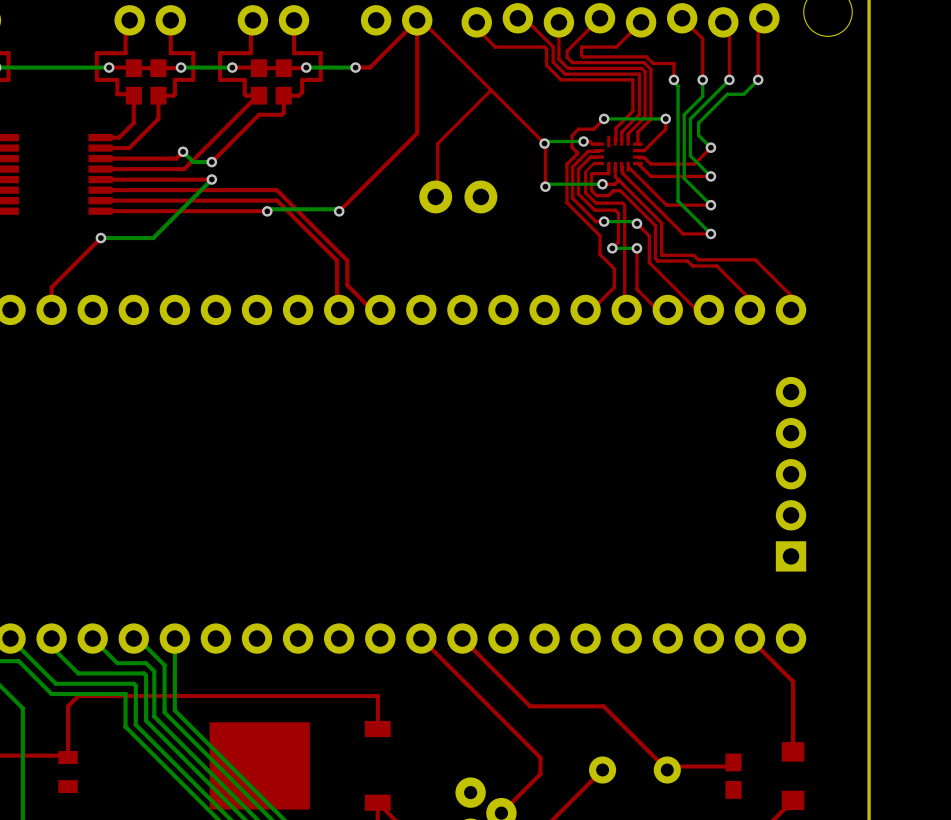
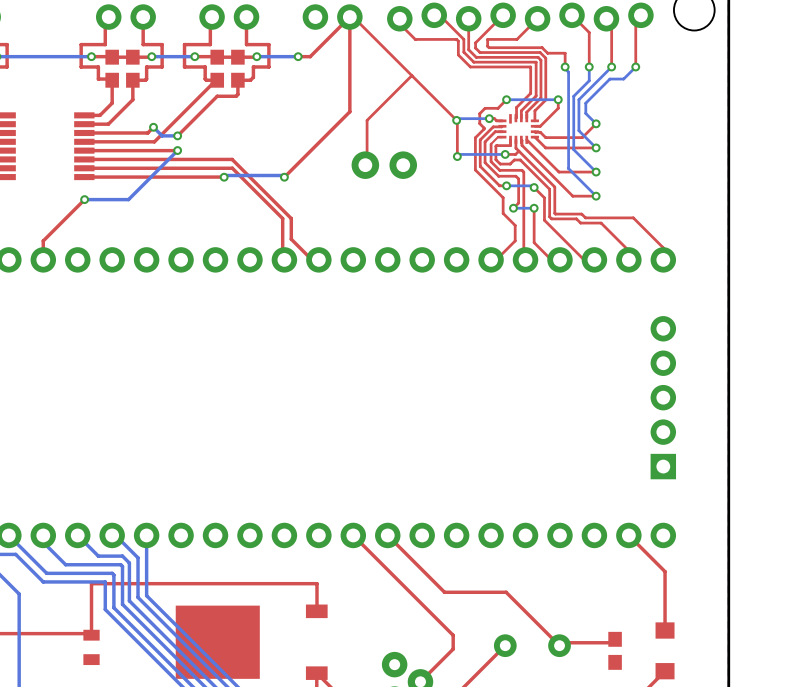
top track: (109, 696) (78, 696) (68, 706) (68, 757) (66, 755) -> (91, 583) (91, 635) (89, 633) (55, 633)
part position: (68, 772) -> (91, 647)

